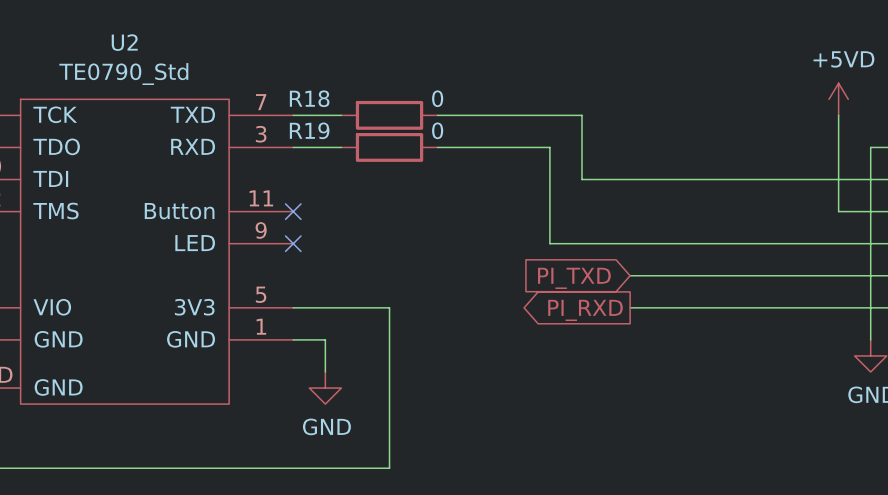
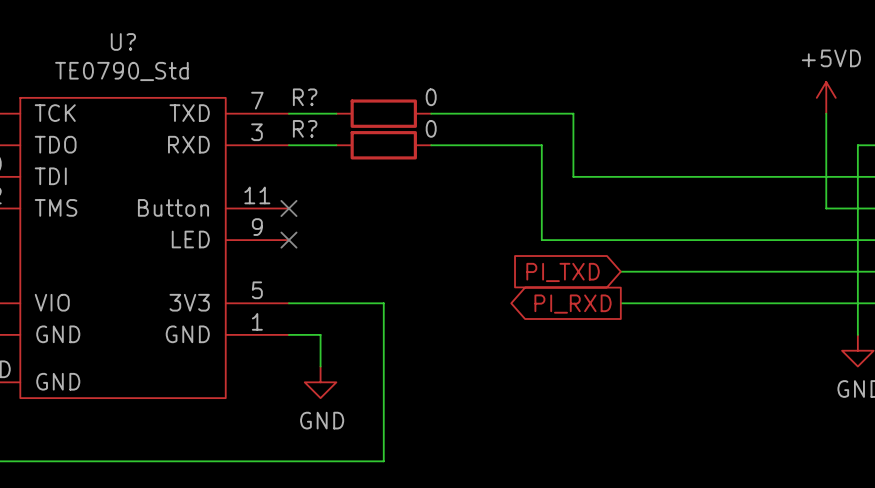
U2 name: U2 (124, 42) -> U? (123, 41)
R18 name: R18 (309, 98) -> R? (305, 97)
R19 name: R19 (309, 130) -> R? (305, 128)

